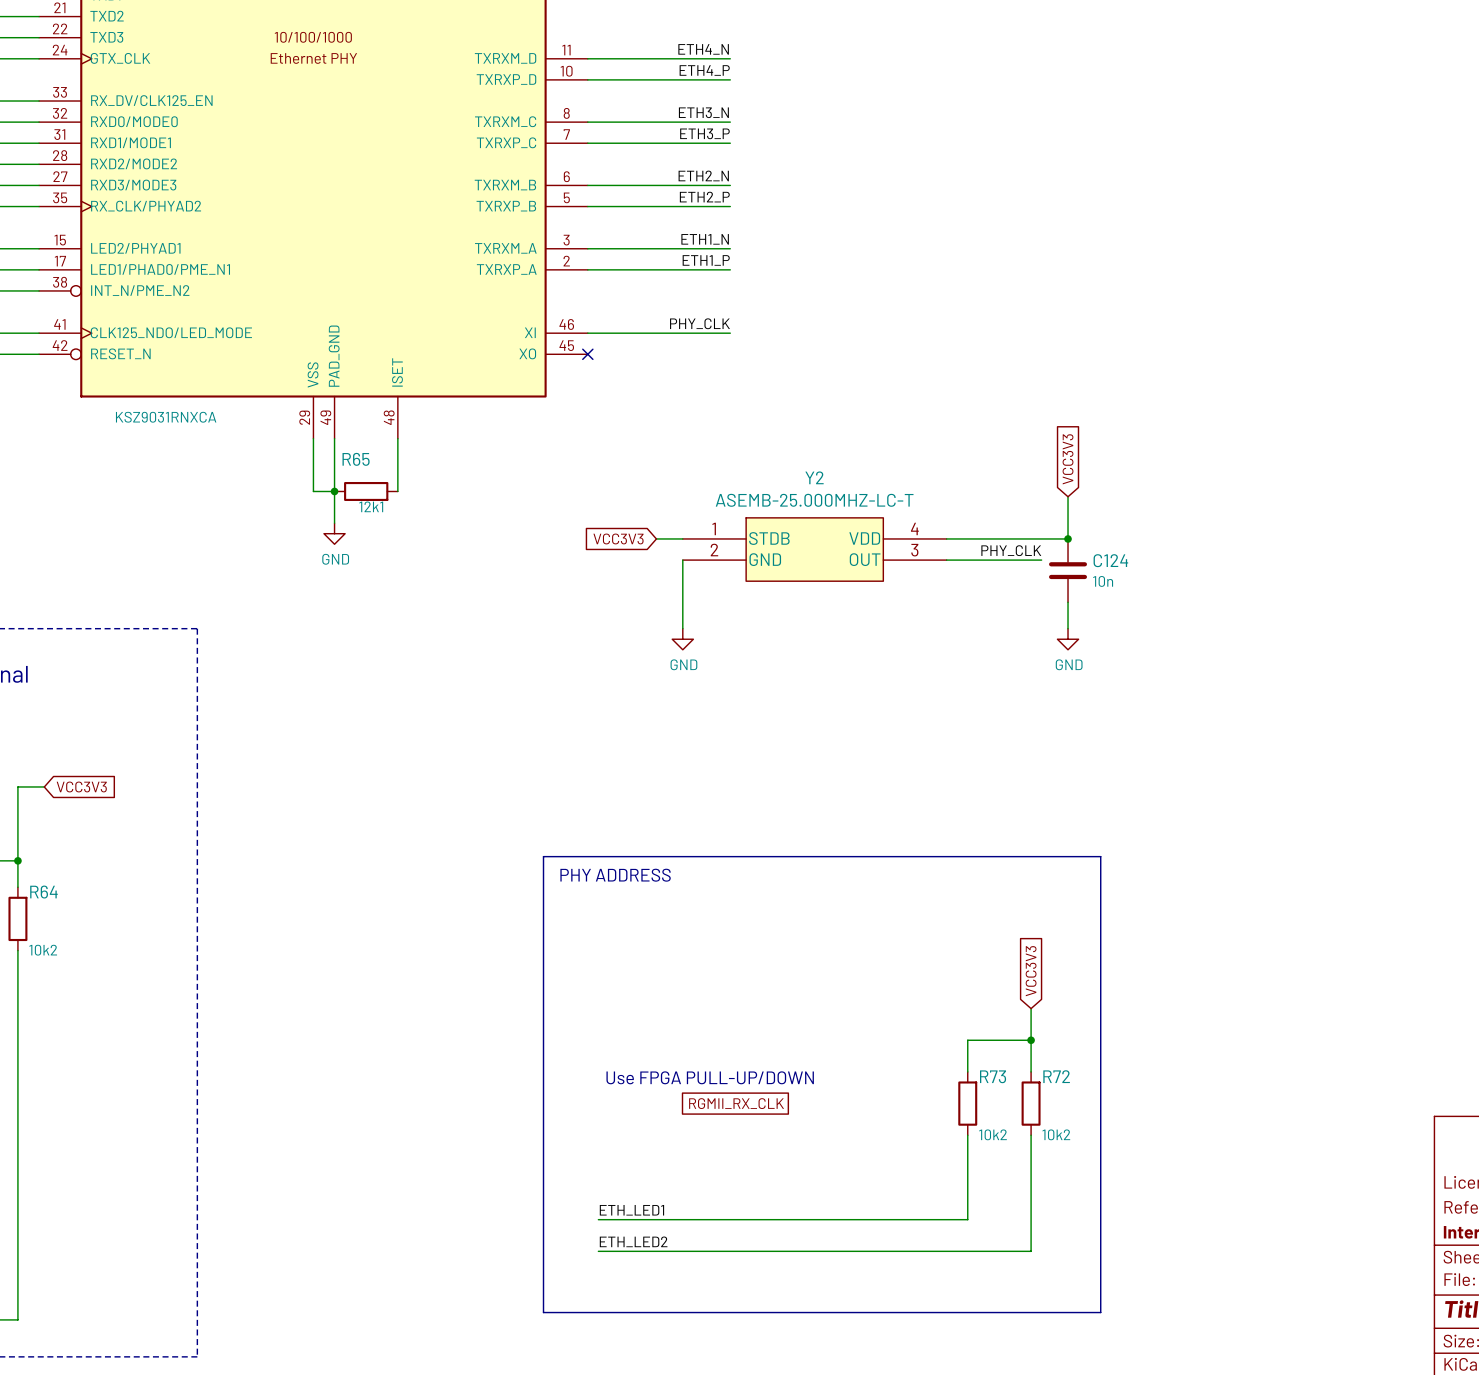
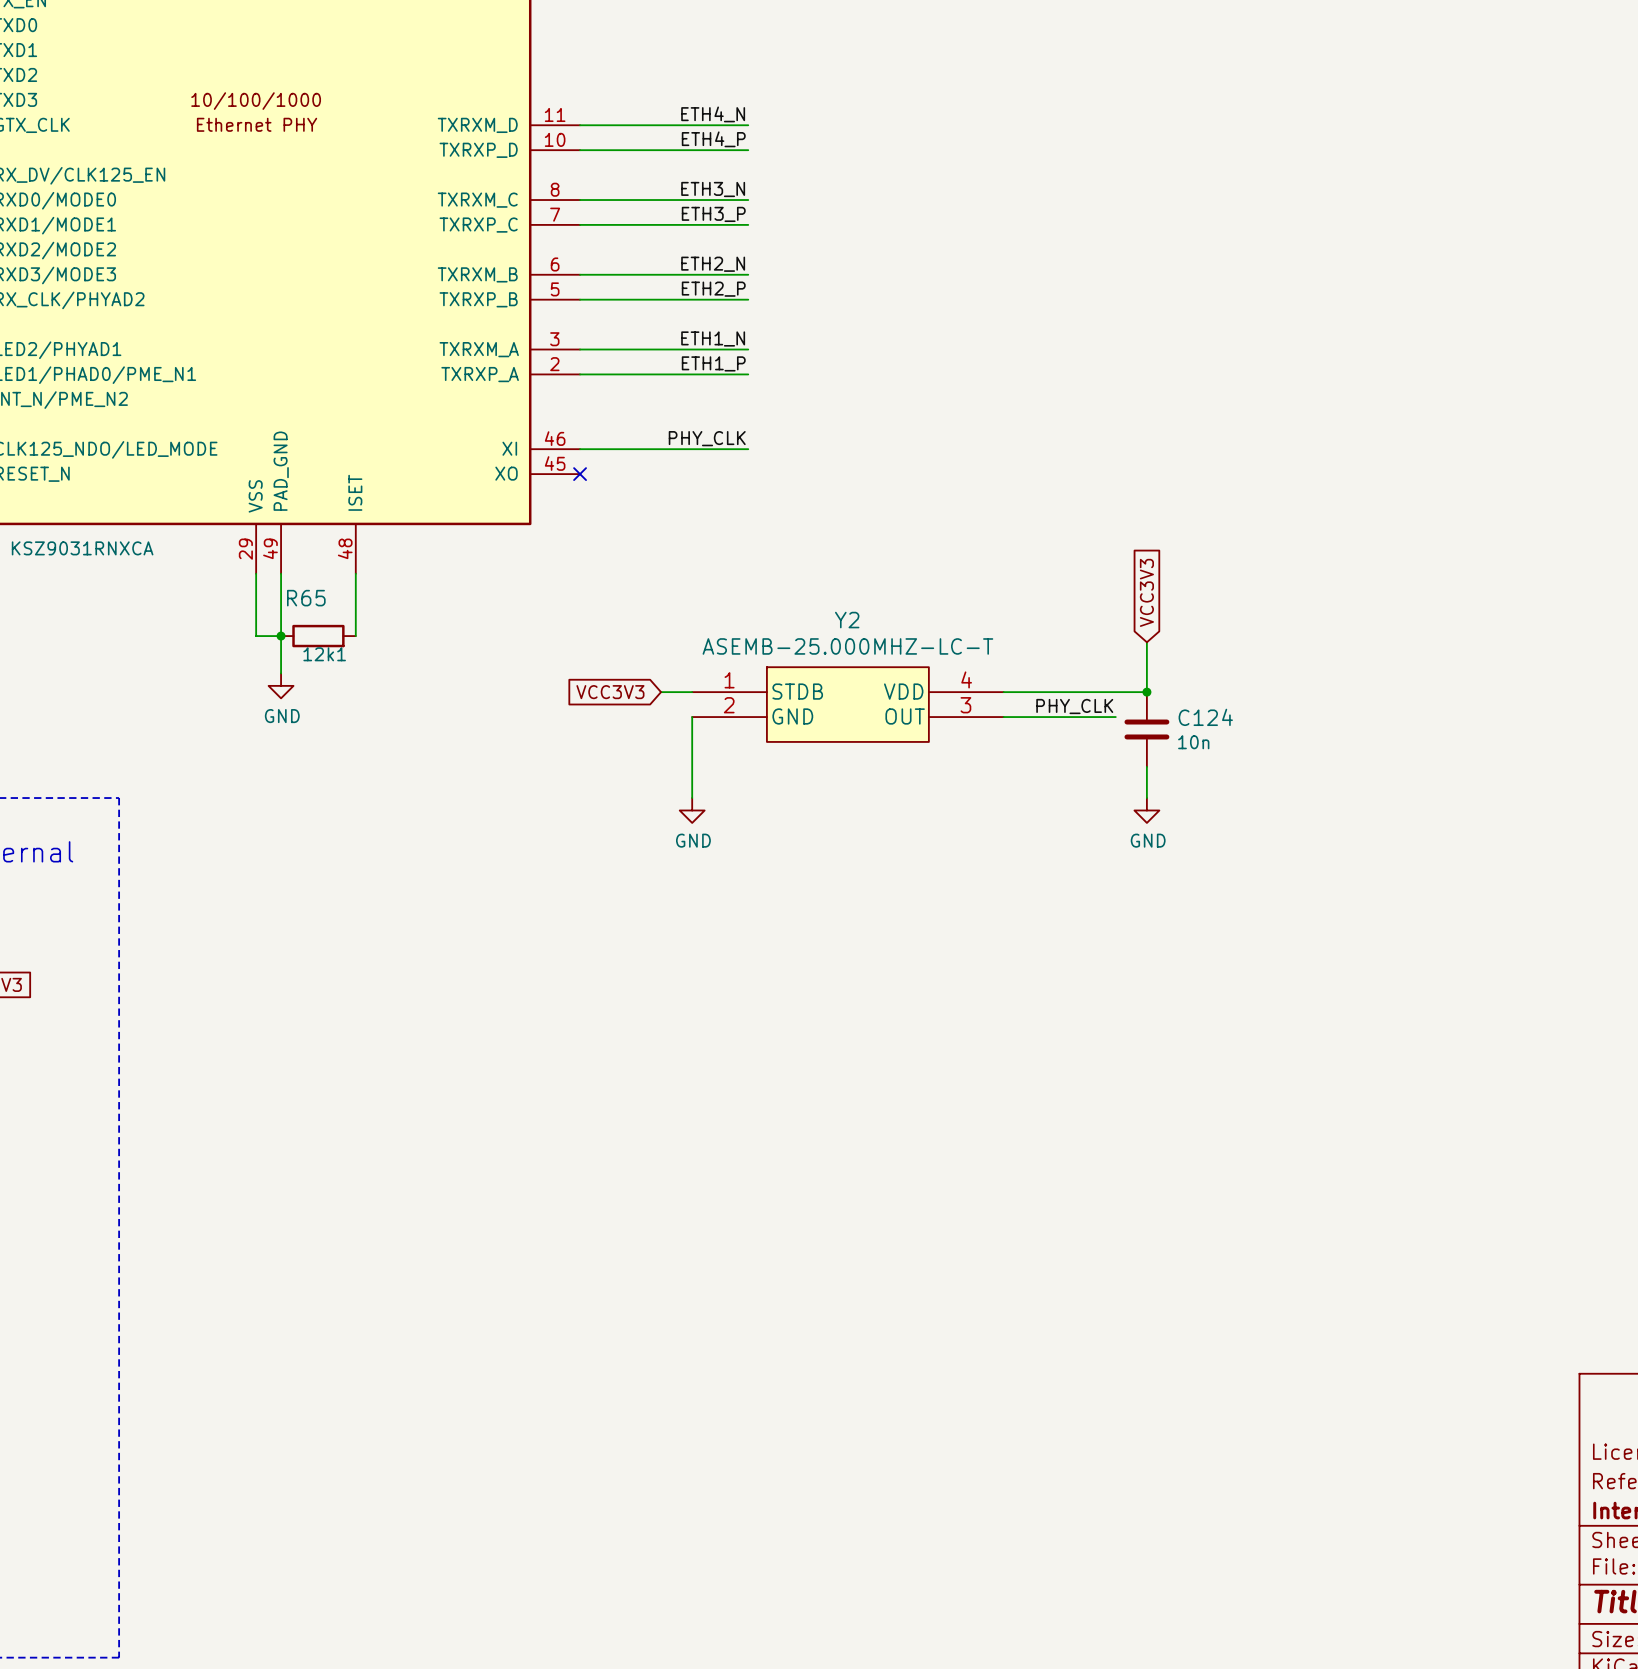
line: (543, 856) (1100, 856) (1100, 1312) (543, 1312) (543, 856) -> none
text: PHY ADDRESS (615, 875) -> none
global label: VCC3V3 (1031, 971) -> none
wire: (1031, 1008) (1031, 1071) -> none
wire: (1031, 1040) (967, 1040) (967, 1071) -> none
junction: (1031, 1040) -> none
text: Use FPGA PULL-UP/DOWN (710, 1077) -> none
global label: RGMII_RX_CLK (736, 1103) -> none
R73: (967, 1103) -> none
R72: (1031, 1103) -> none
wire: (967, 1135) (967, 1219) (598, 1219) -> none
wire: (1031, 1135) (1031, 1251) (598, 1251) -> none
label: ETH_LED1 (631, 1210) -> none
label: ETH_LED2 (633, 1241) -> none

